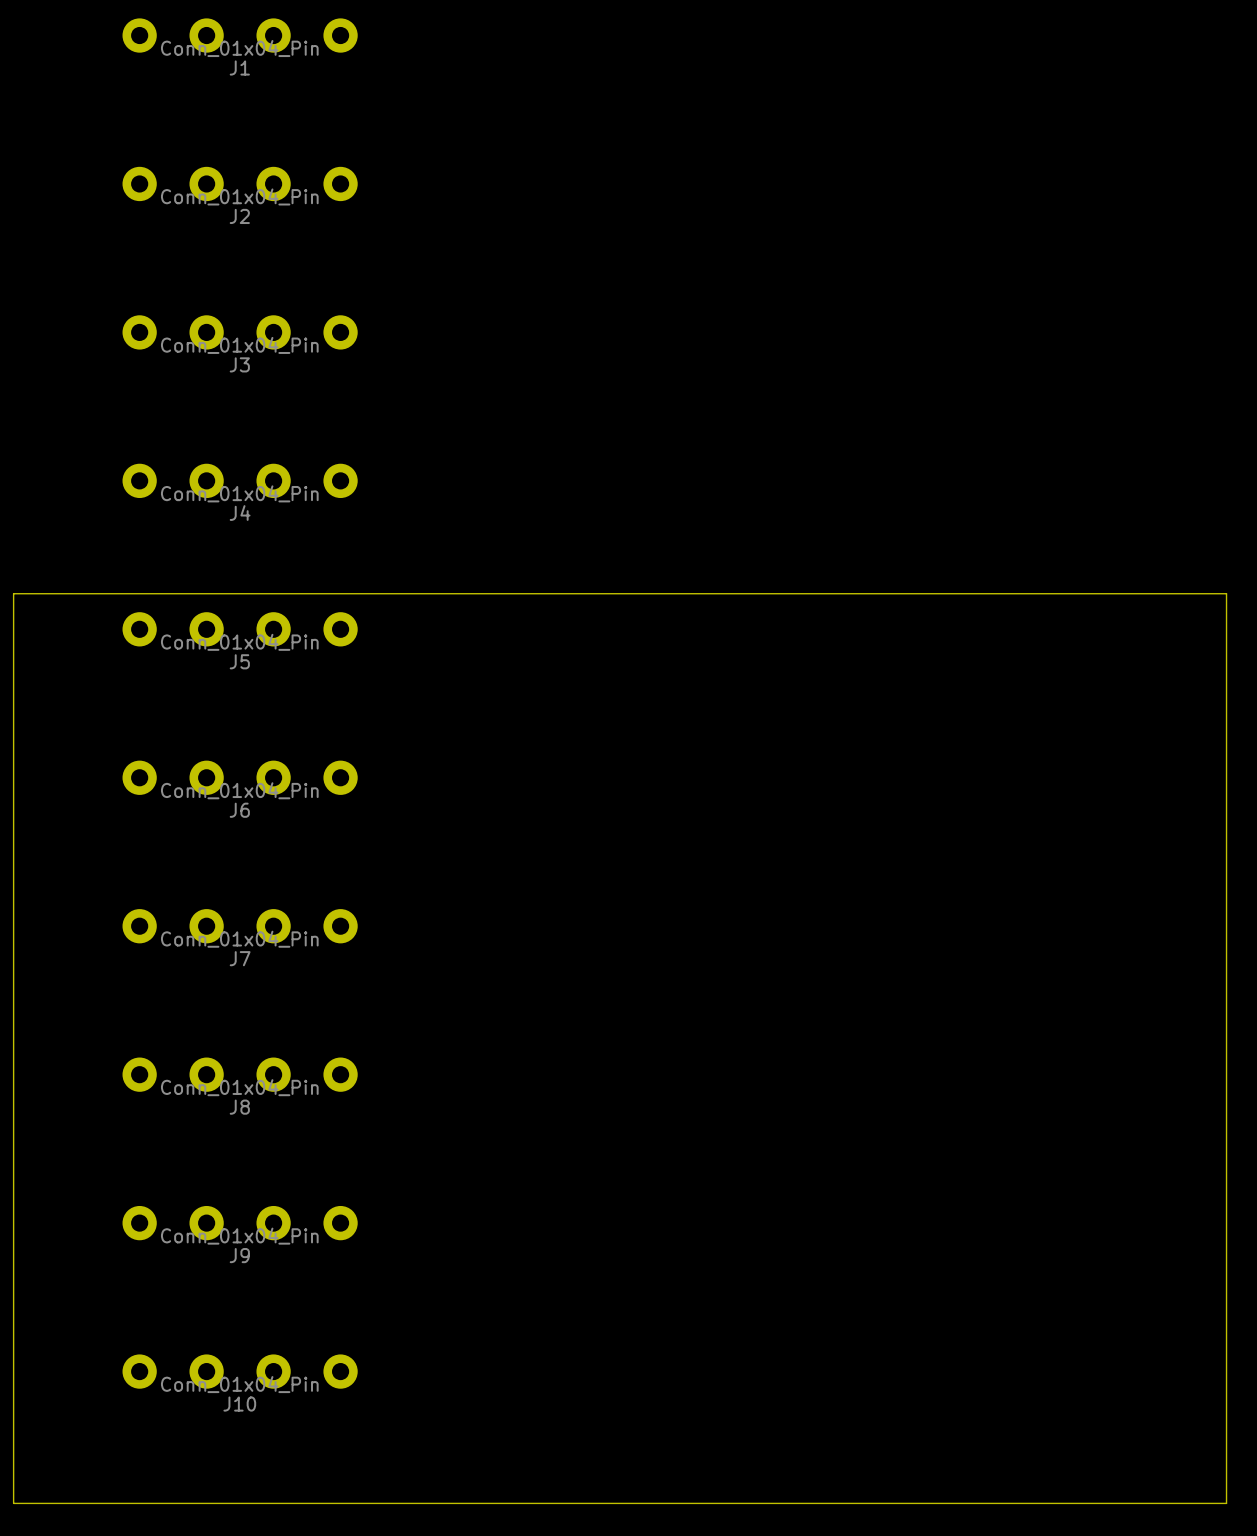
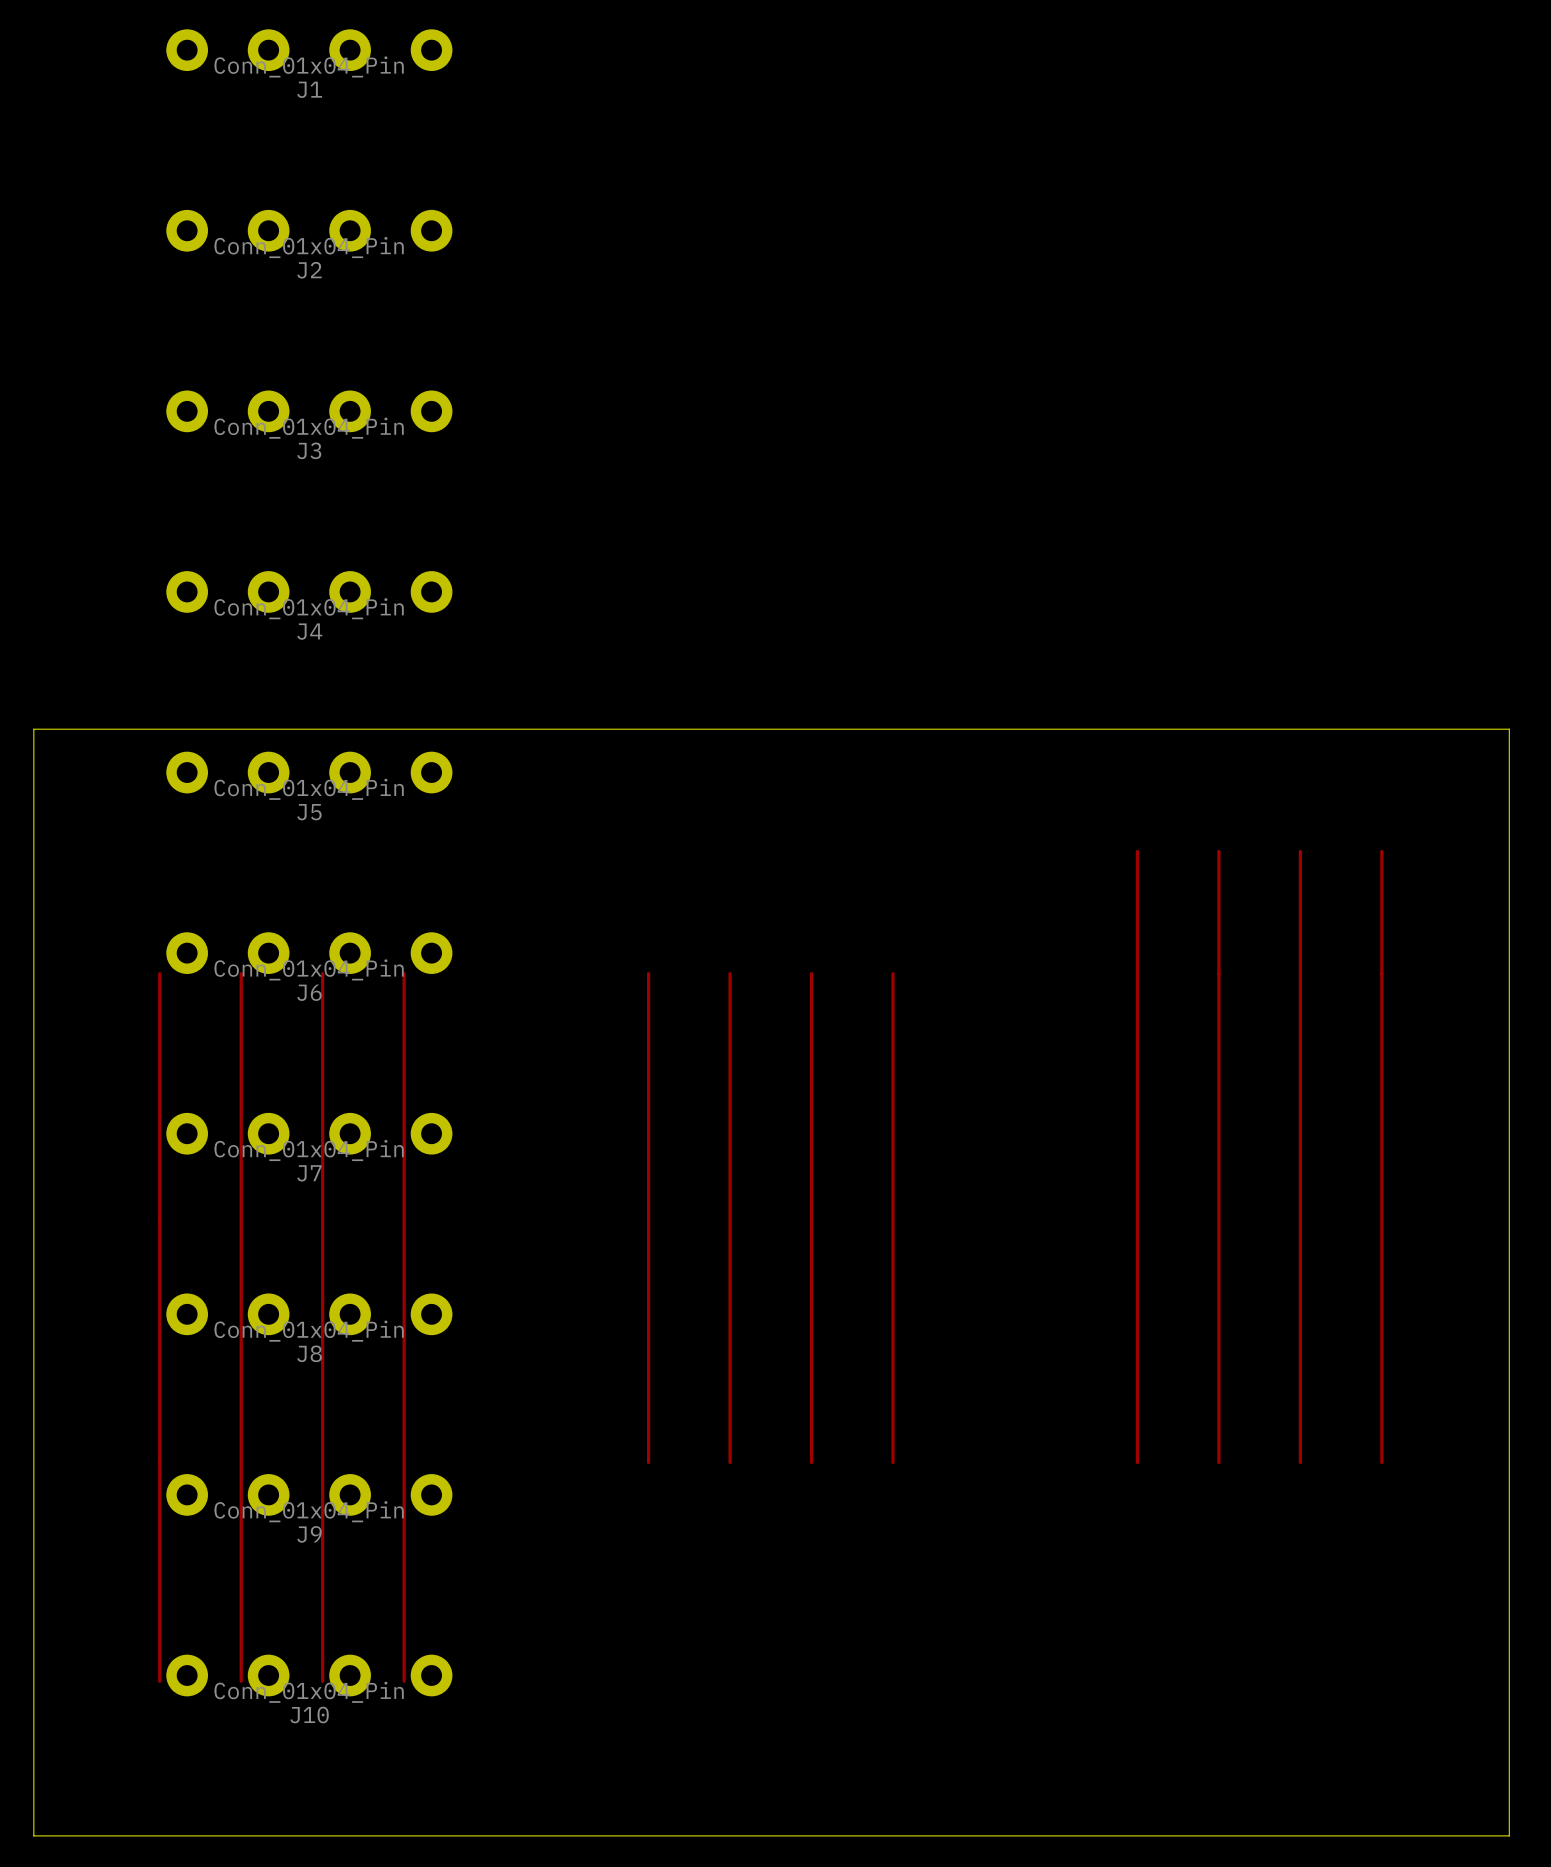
track: none -> (1137, 851) (1137, 1462)
track: none -> (1218, 851) (1218, 1462)
track: none -> (1300, 851) (1300, 1462)
track: none -> (1381, 851) (1381, 1462)
track: none -> (159, 973) (159, 1681)
track: none -> (241, 973) (241, 1681)
track: none -> (322, 973) (322, 1681)
track: none -> (404, 973) (404, 1681)
track: none -> (648, 973) (648, 1462)
track: none -> (730, 973) (730, 1462)
track: none -> (811, 973) (811, 1462)
track: none -> (893, 973) (893, 1462)

